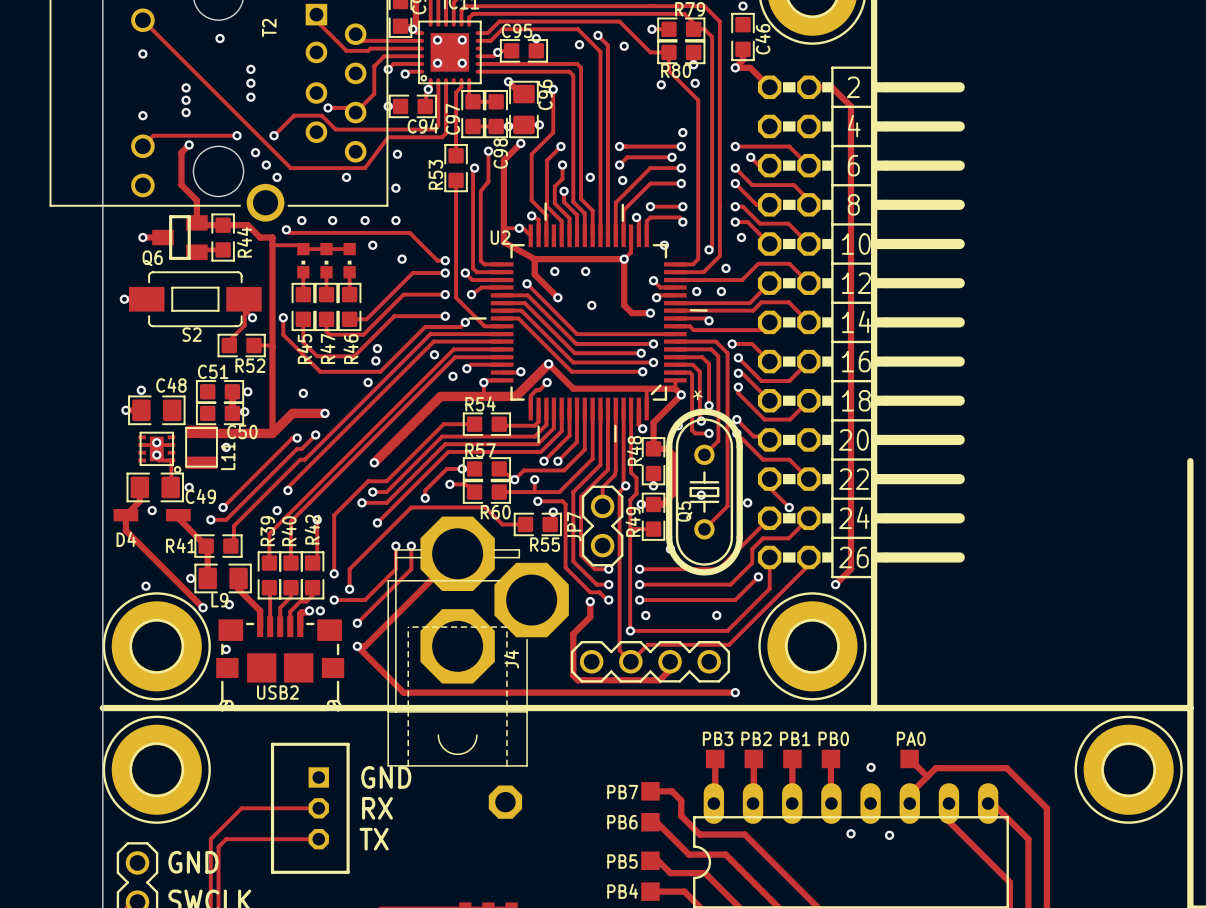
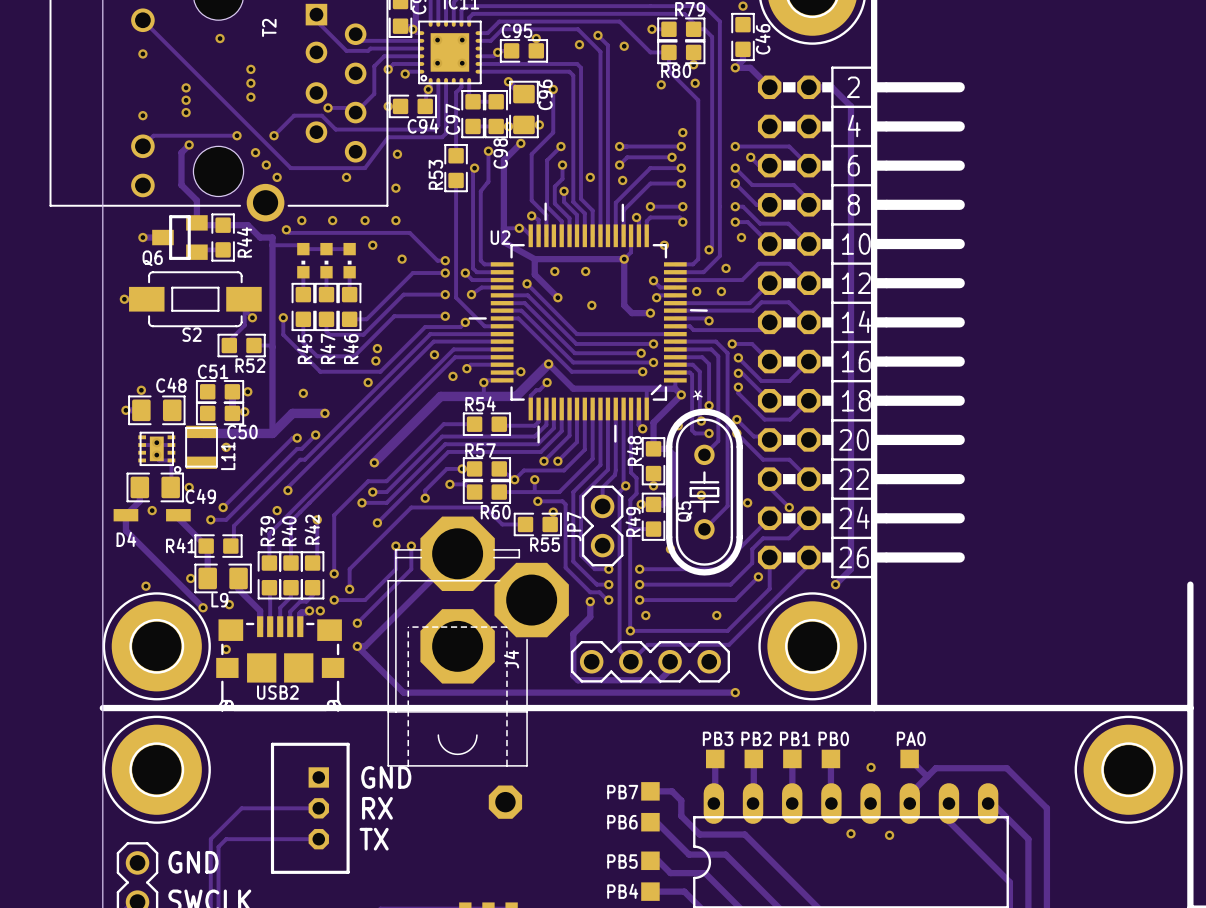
line: (1190, 461) (1190, 584) -> none

